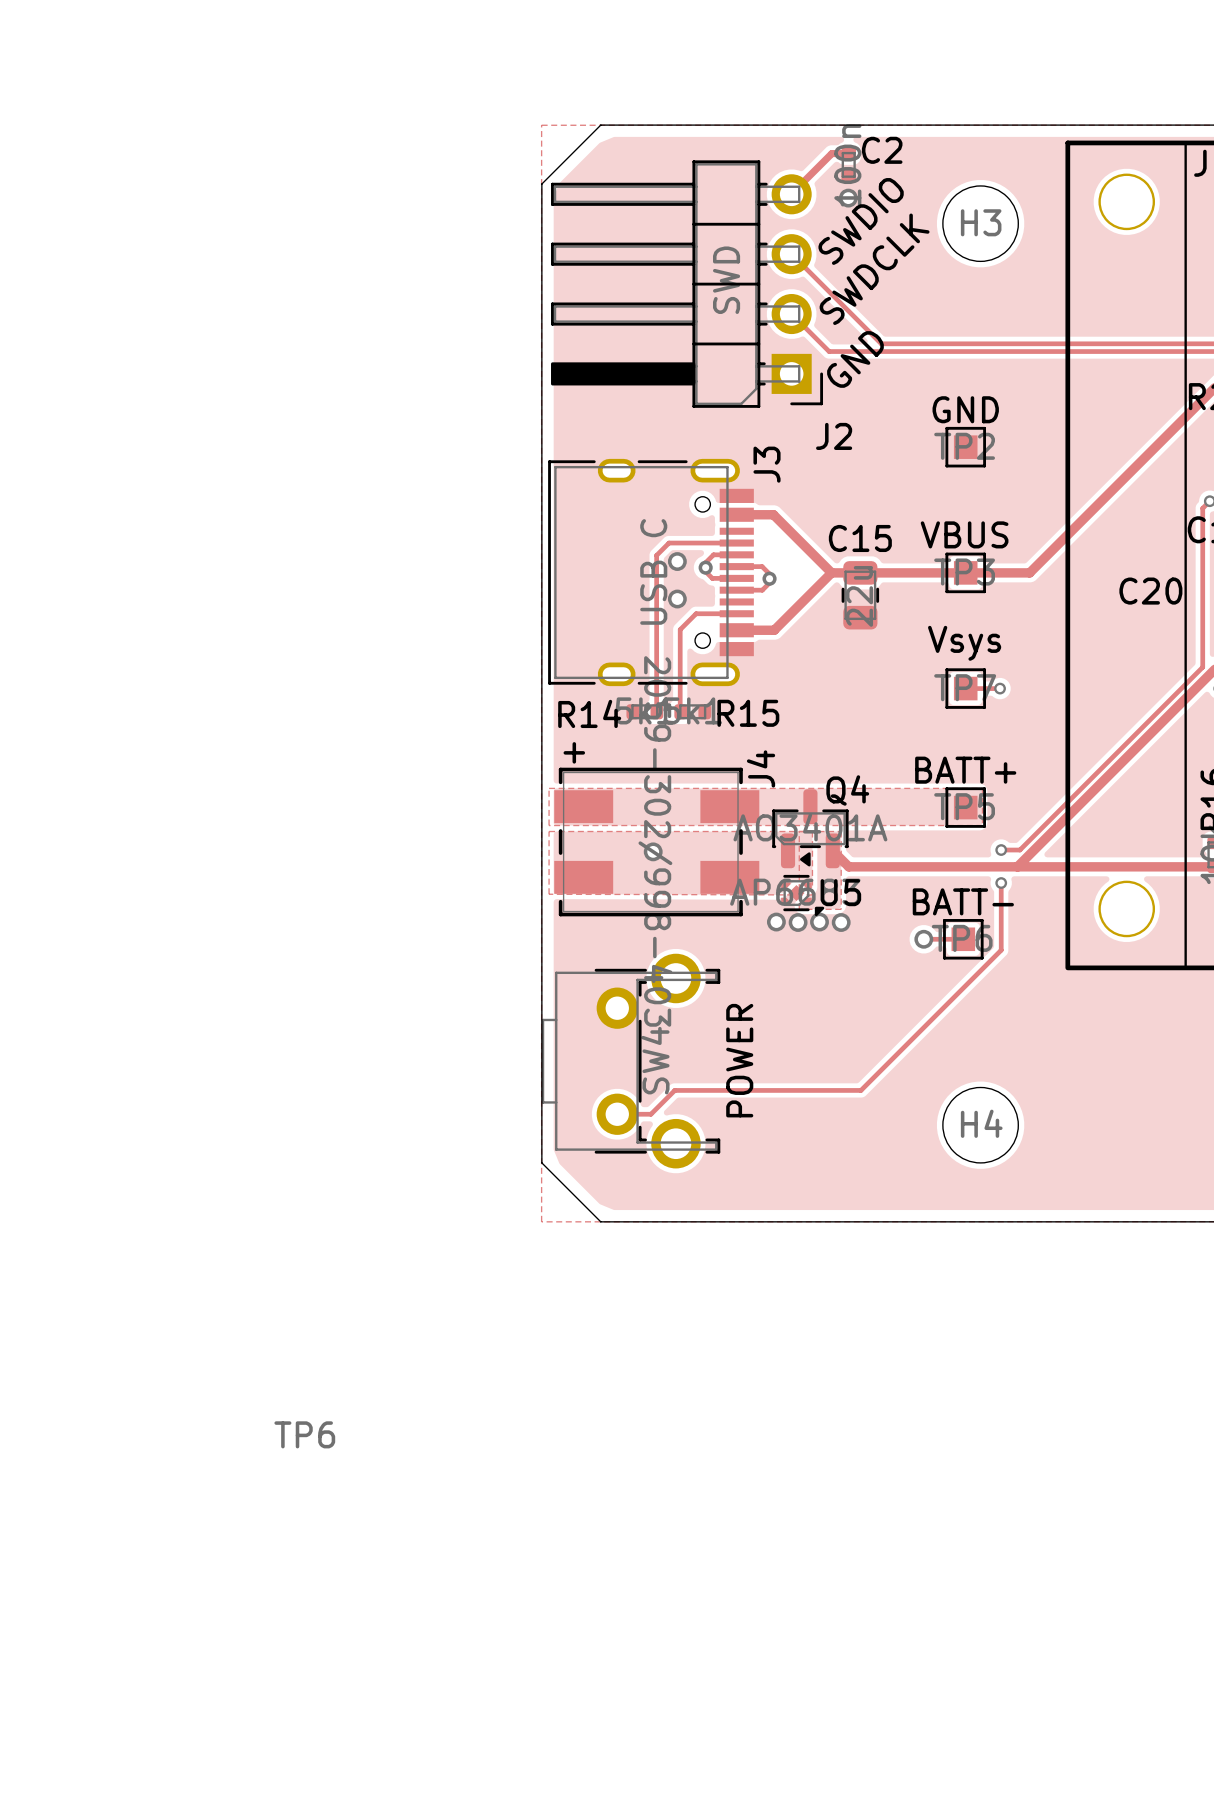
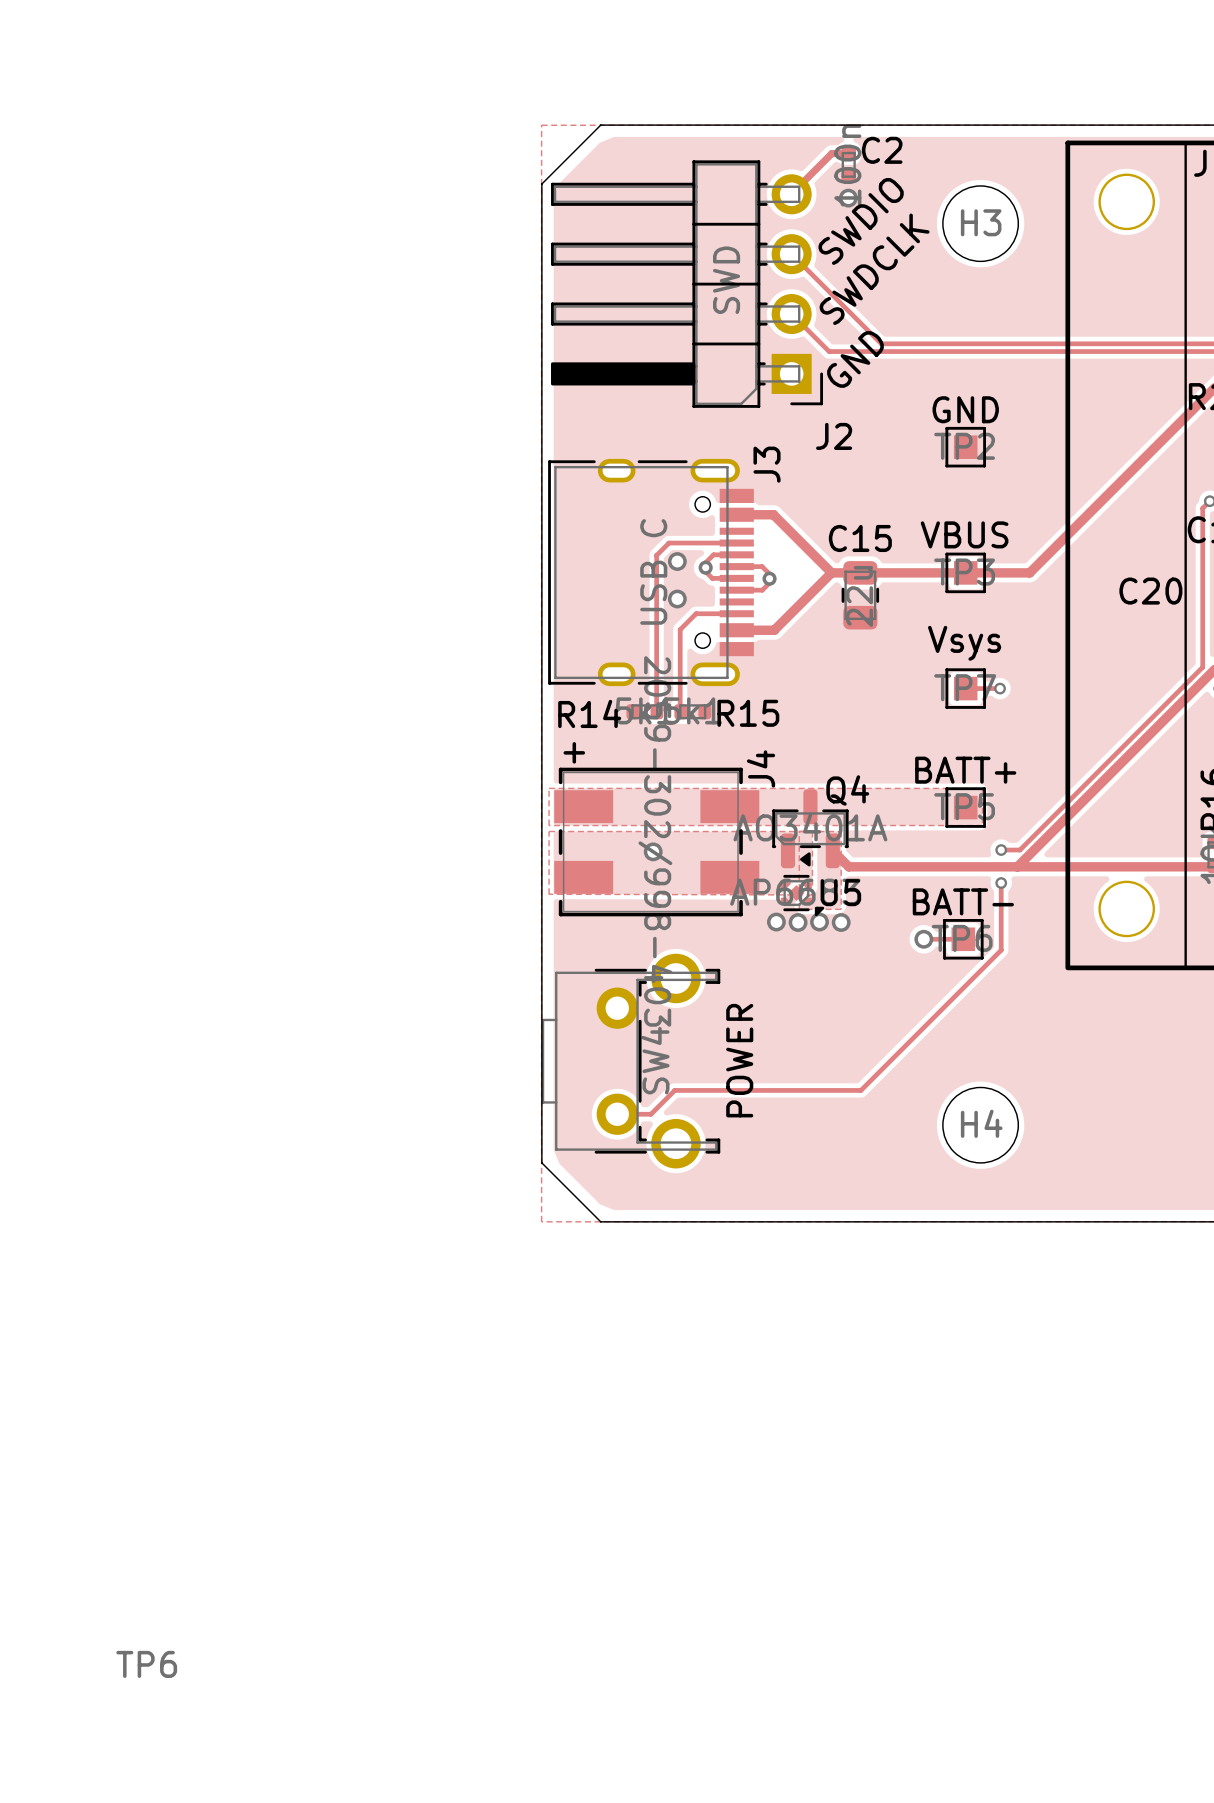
text position: TP6 (304, 1434) -> TP6 (146, 1664)

